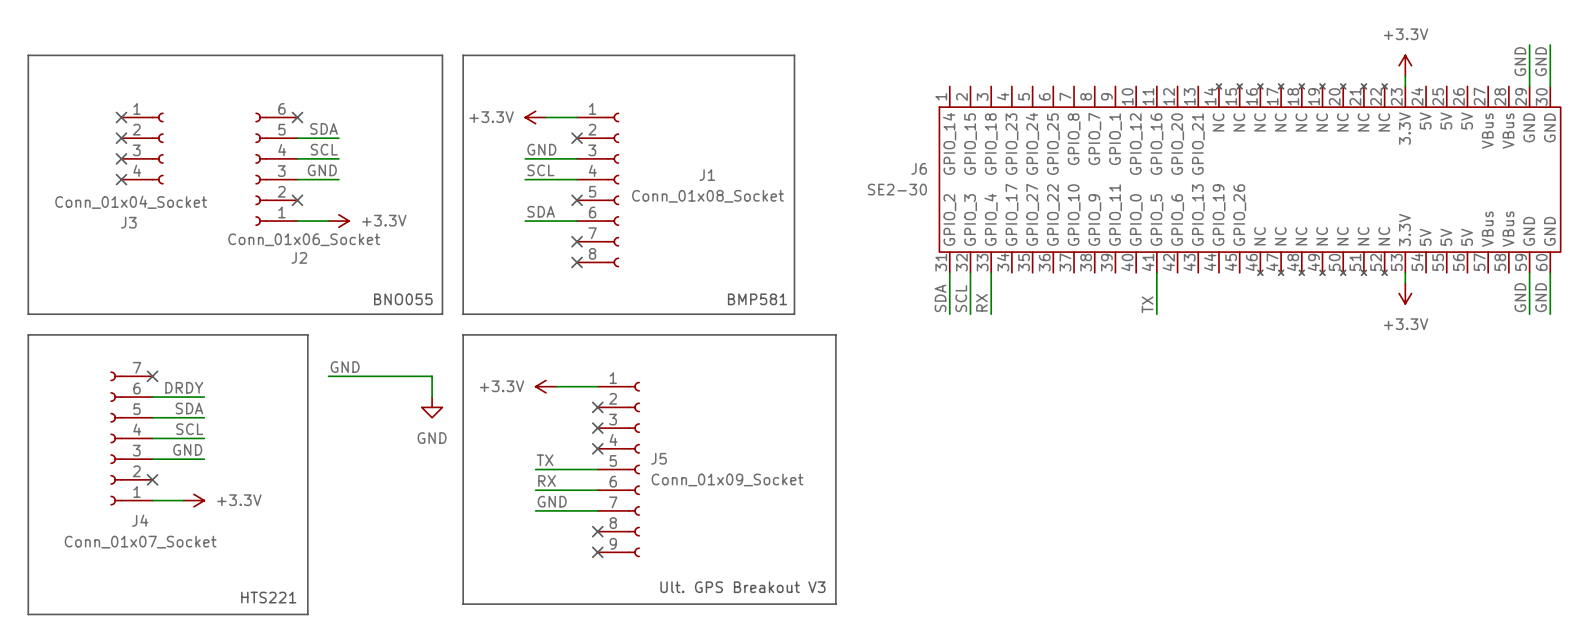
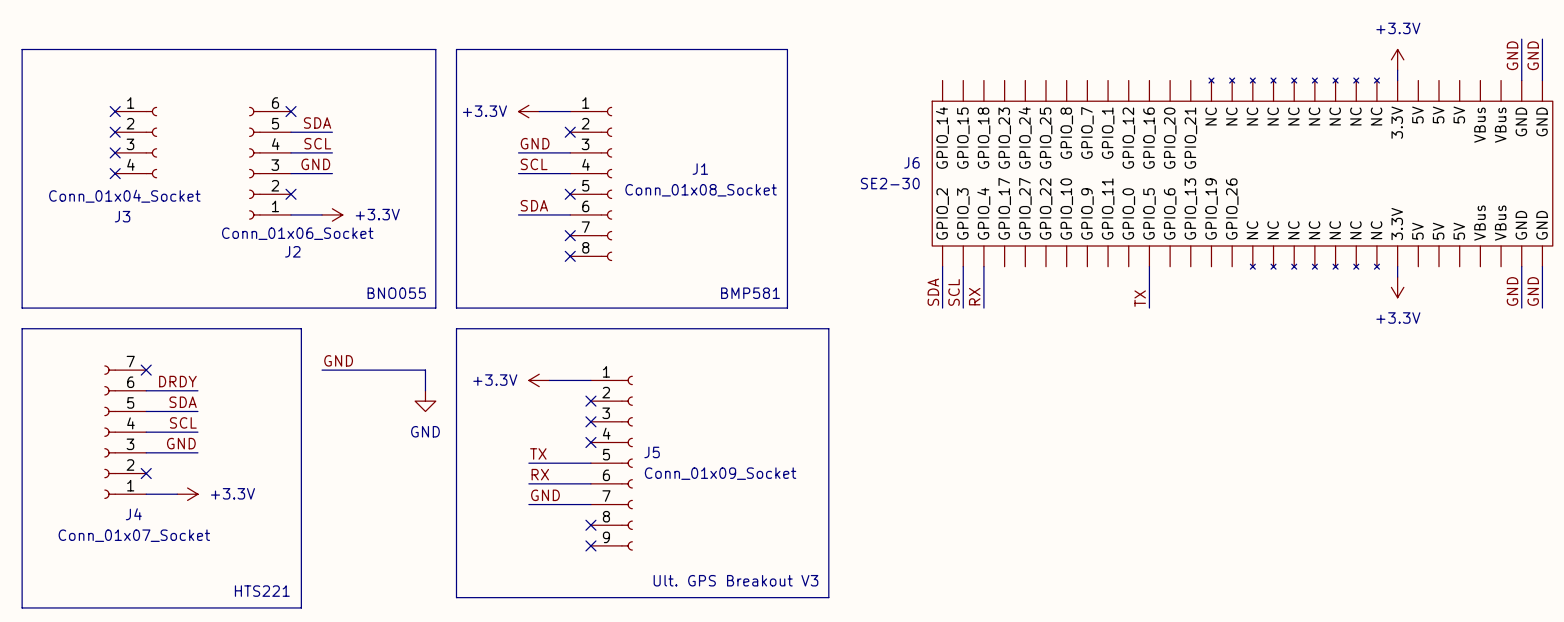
J6 symbol: [939, 83, 1561, 276] -> [932, 78, 1553, 270]

